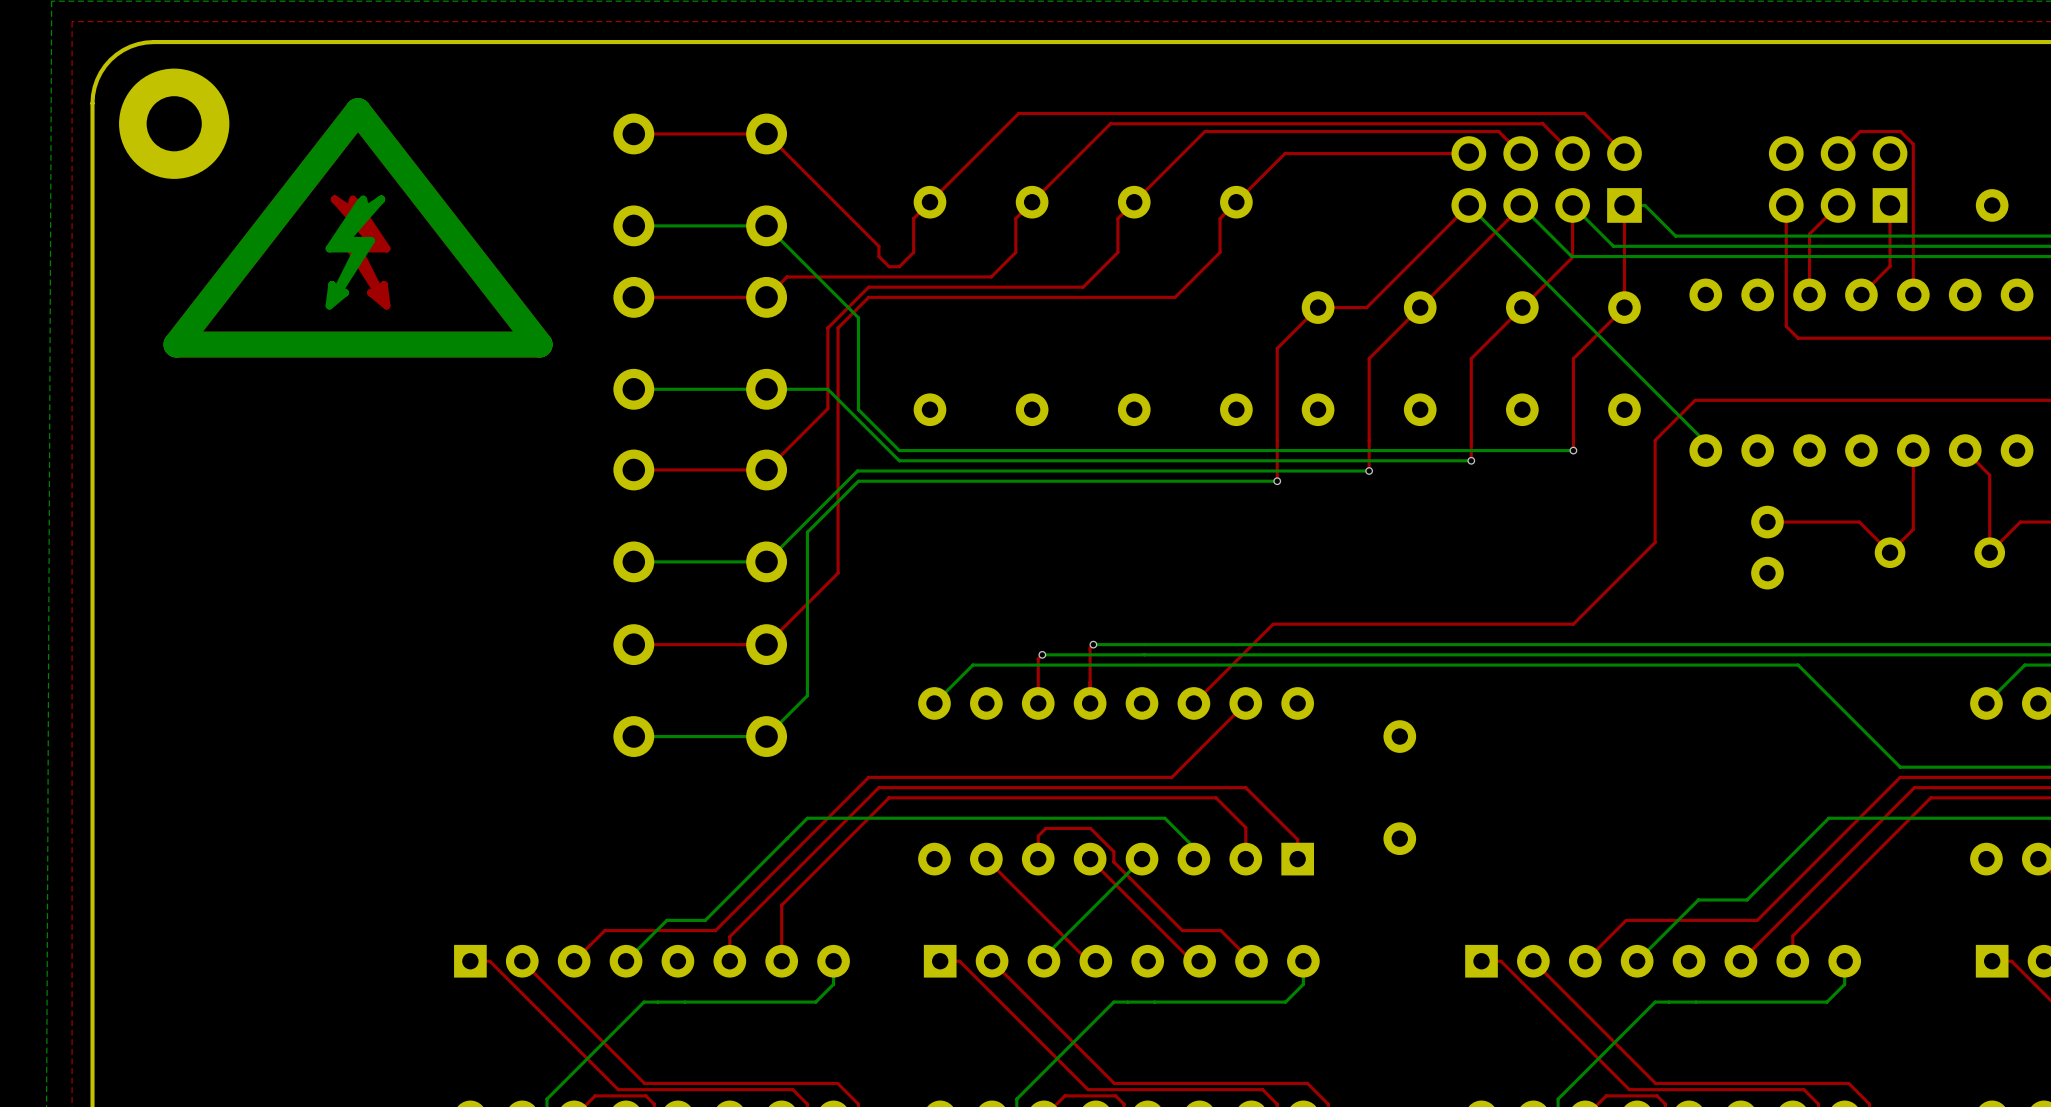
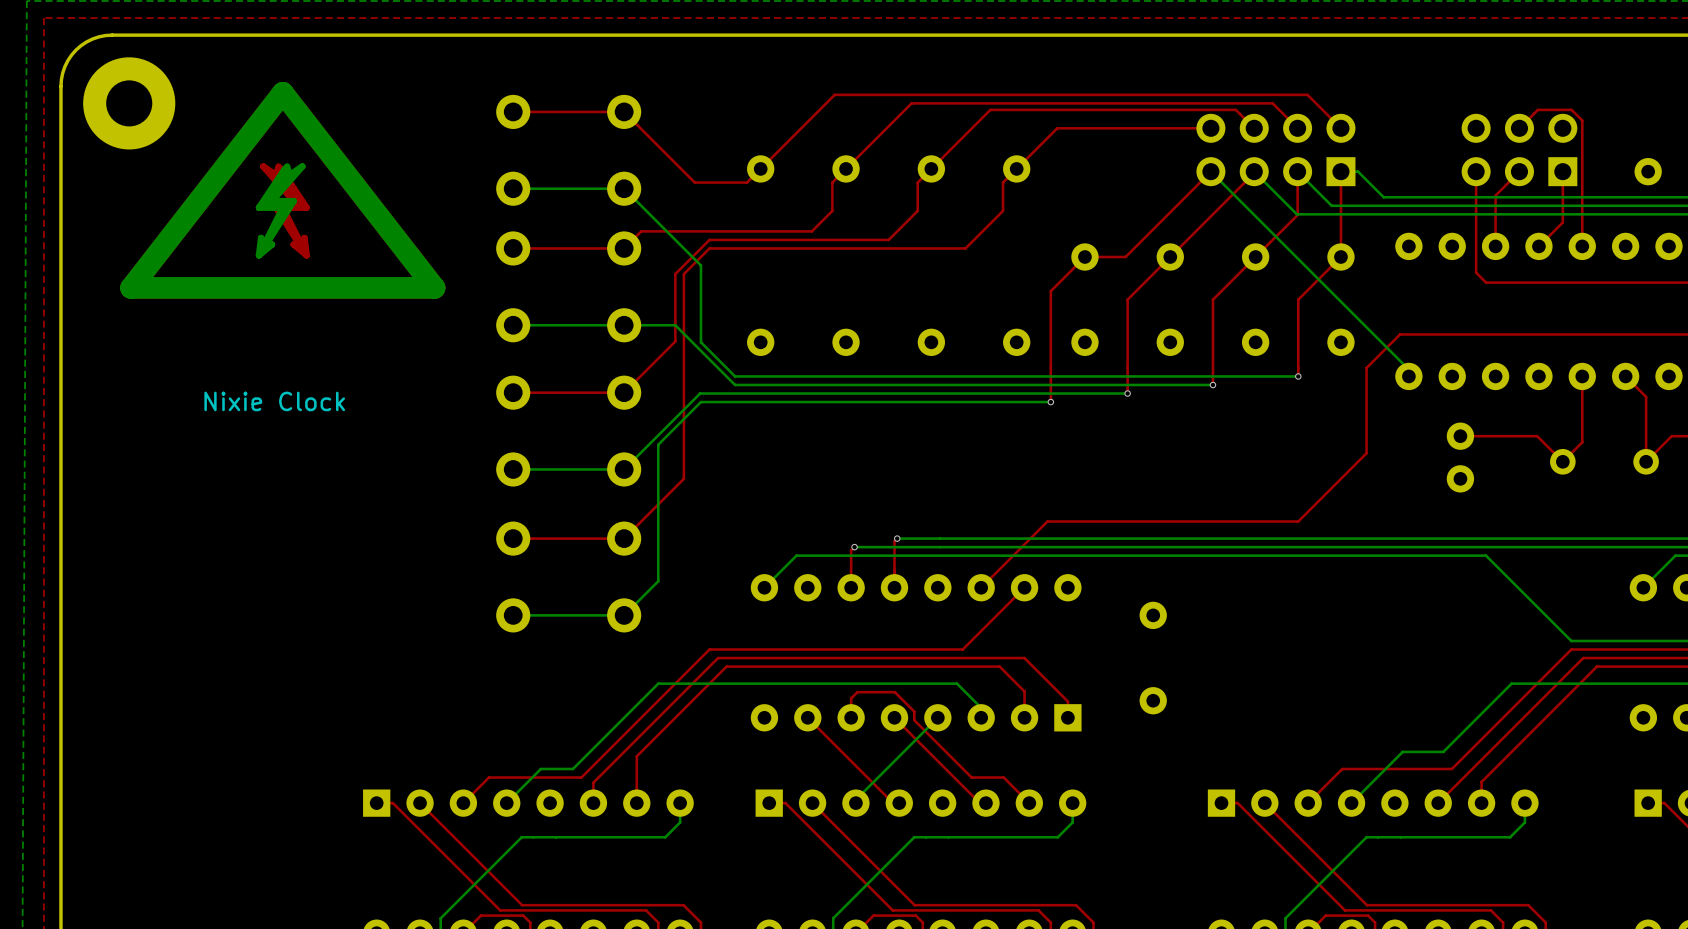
top track: (913, 218) (913, 252) (899, 266) (889, 266) (878, 256) (878, 246) (851, 218) -> (747, 182) (694, 182)
text: none -> Nixie Clock (274, 401)

